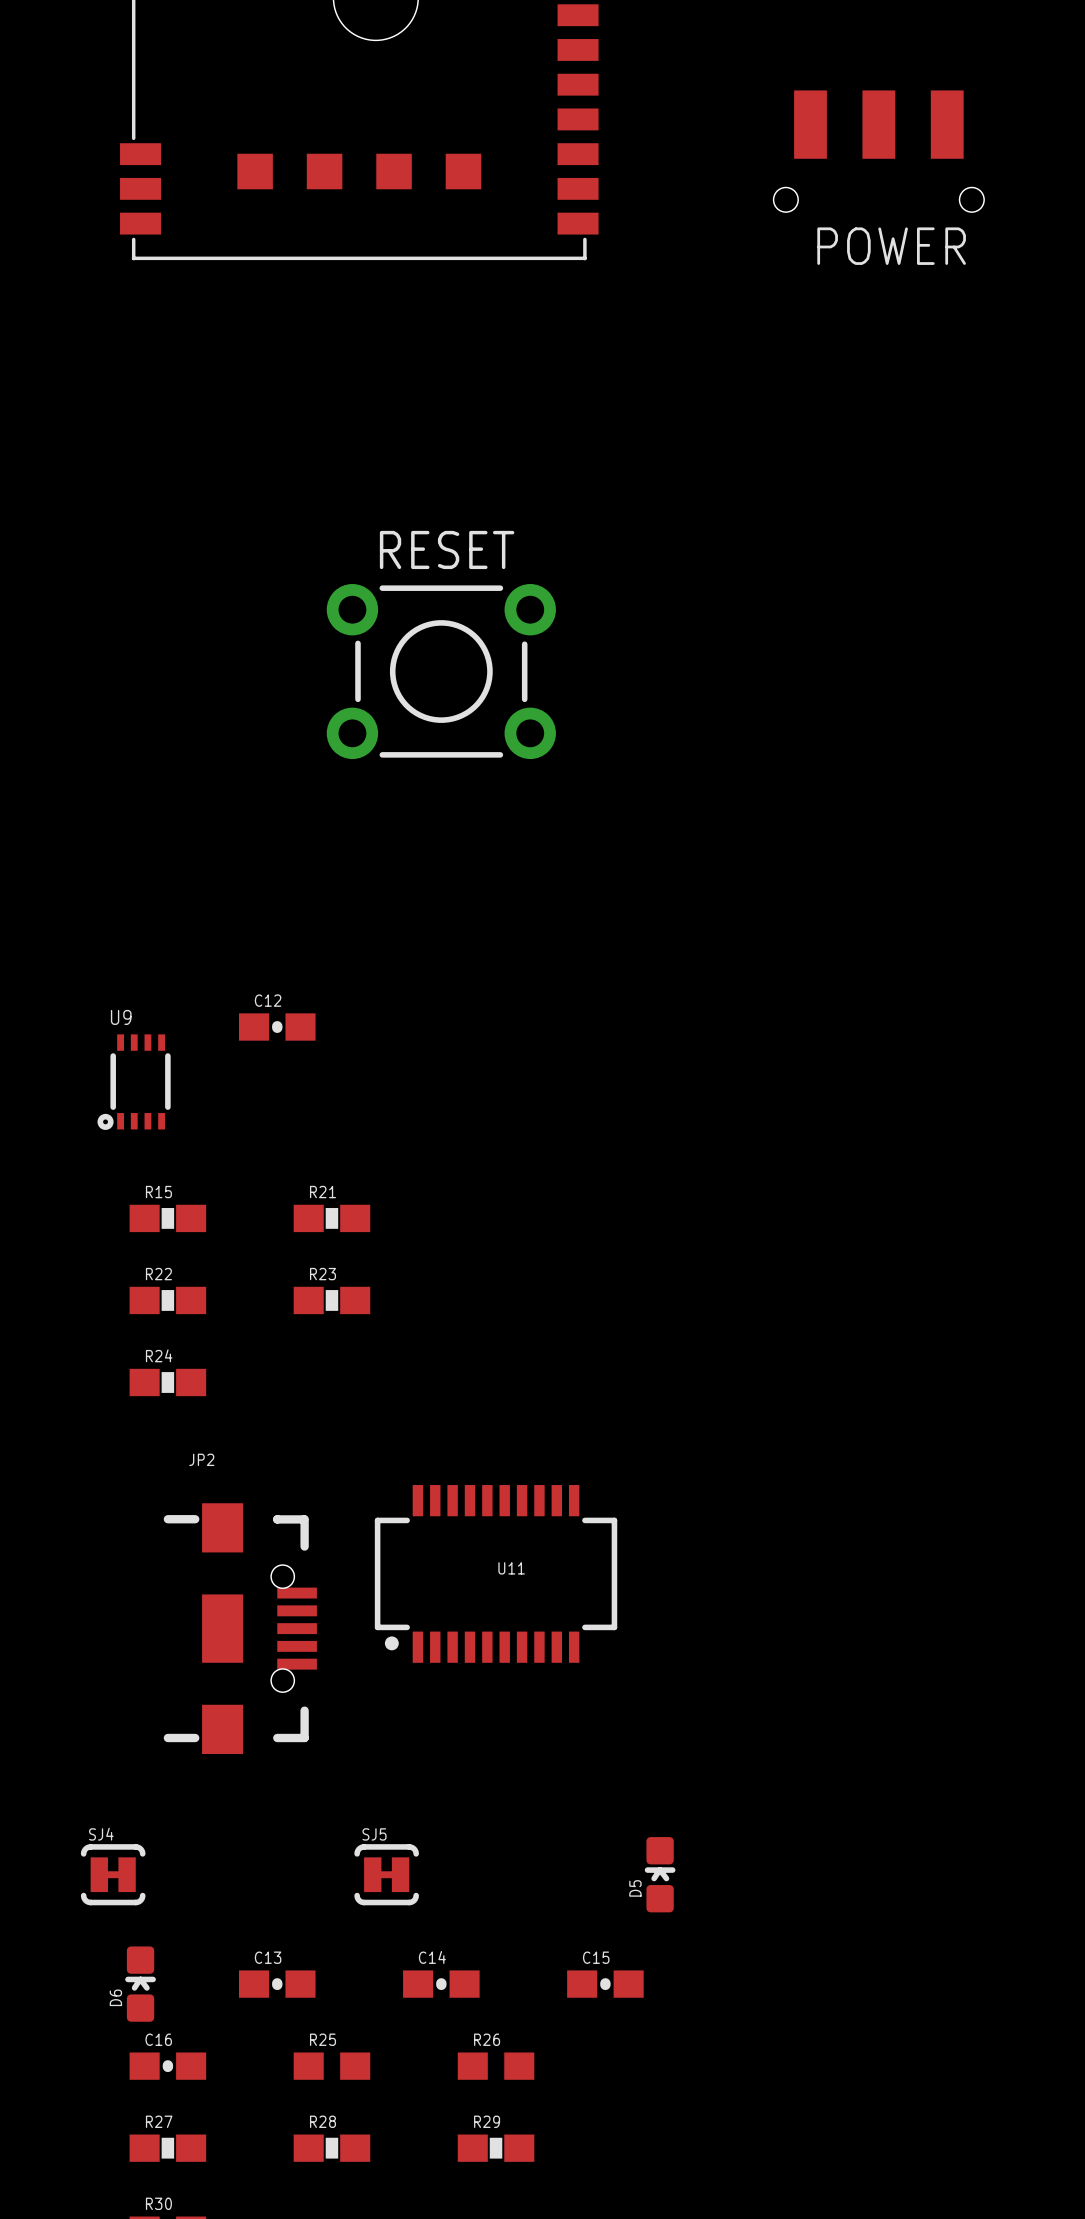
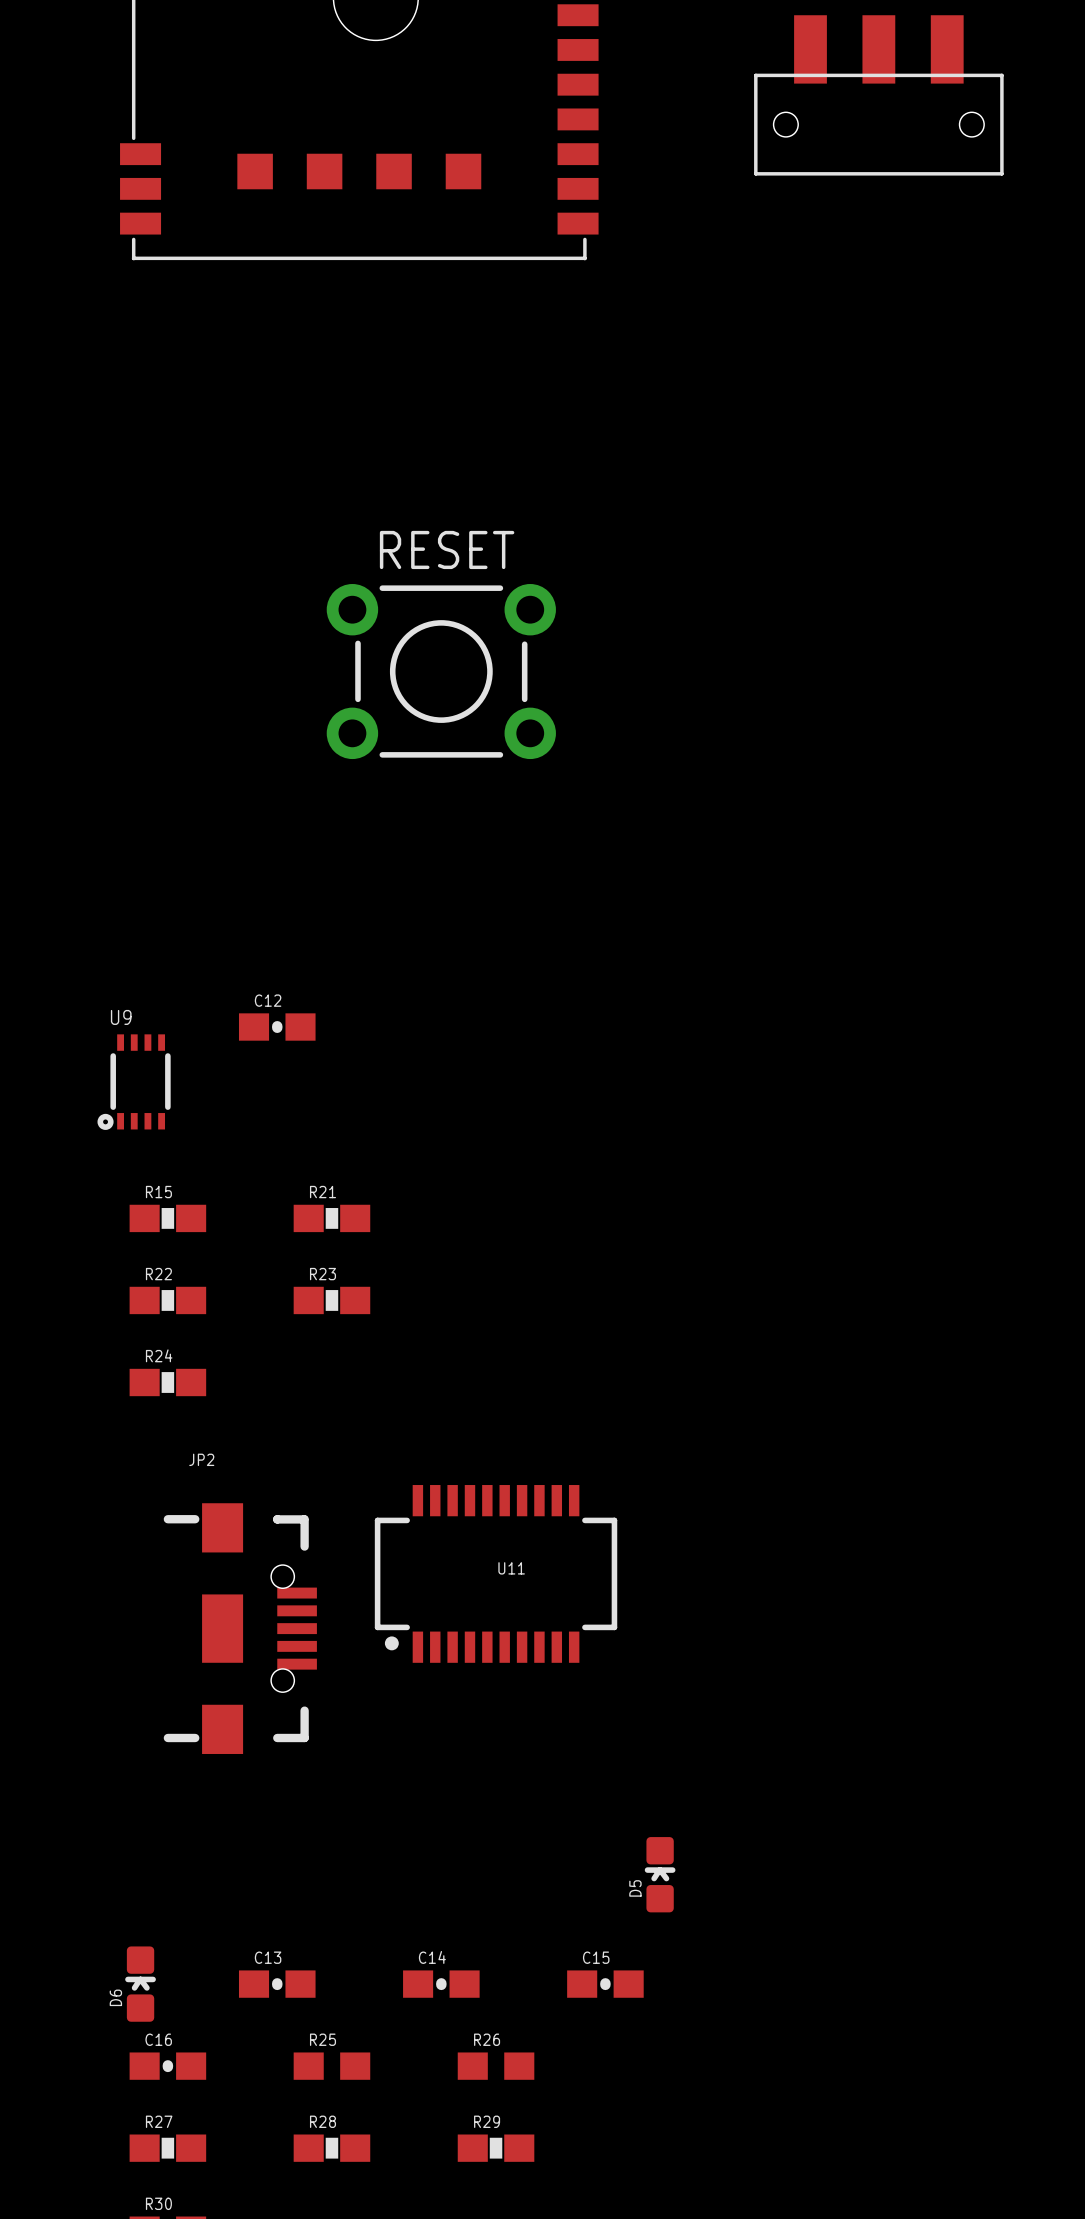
part: none -> (878, 95)
POWER: (878, 151) -> none
SJ4: (113, 1874) -> none
SJ5: (386, 1874) -> none

